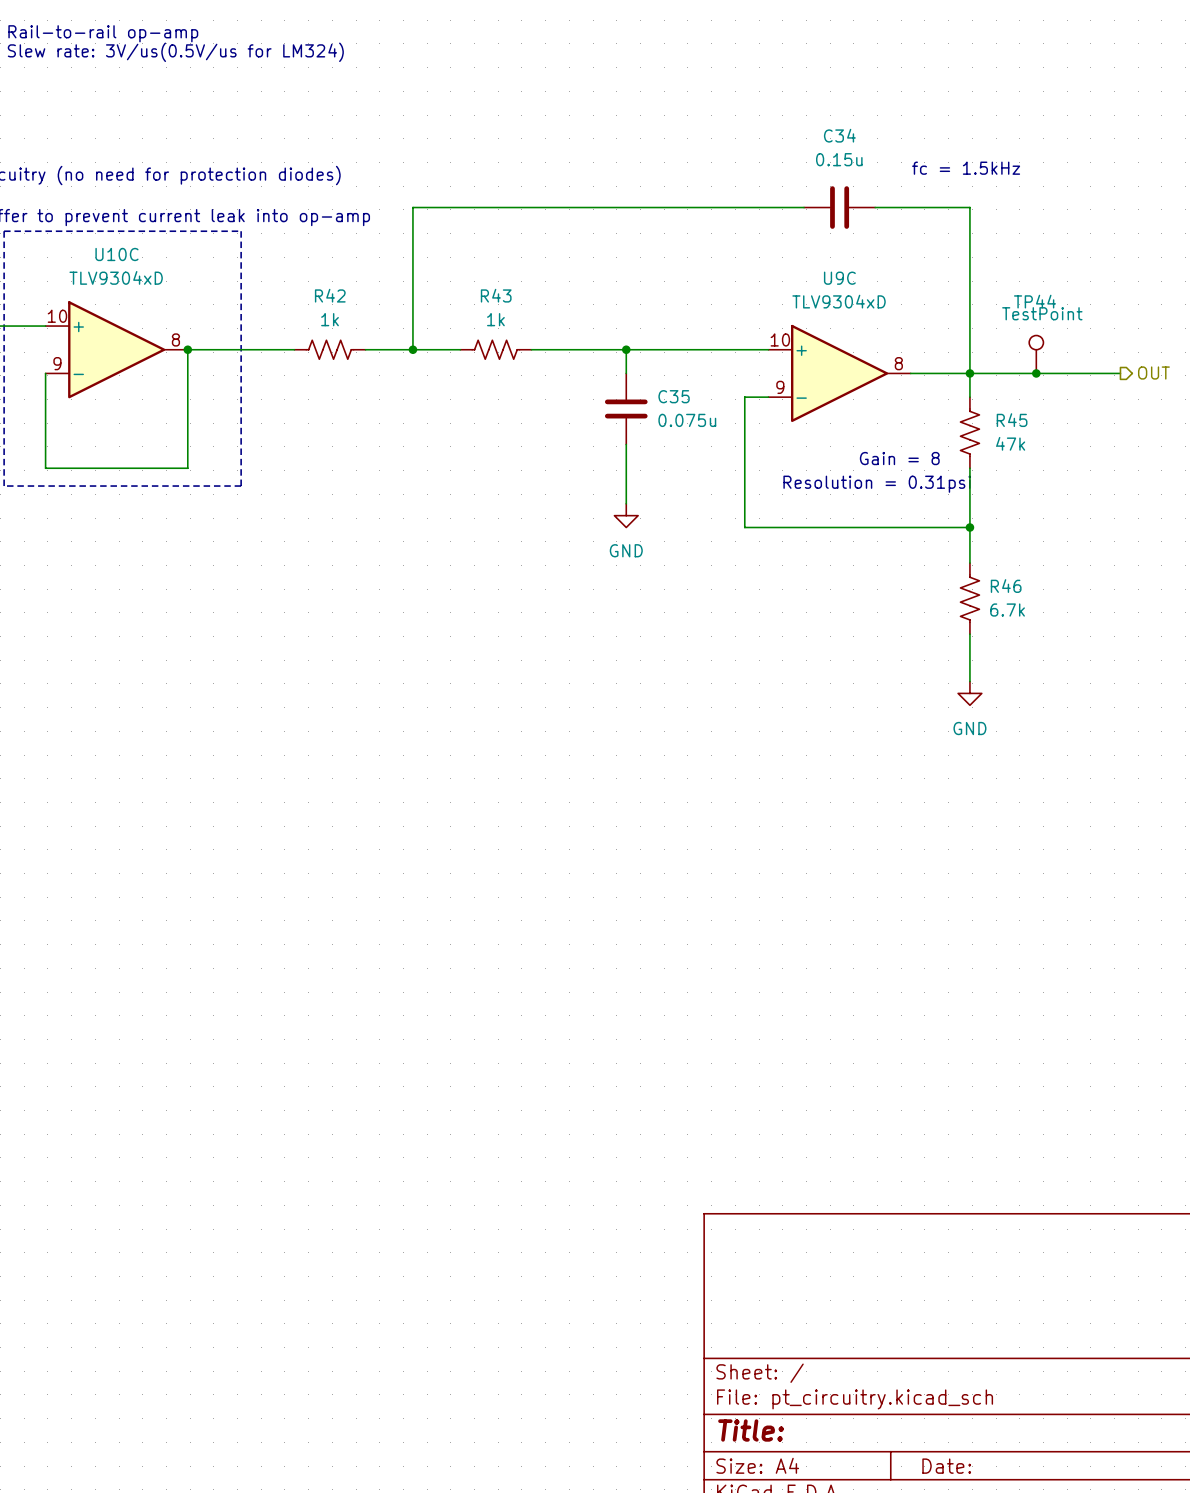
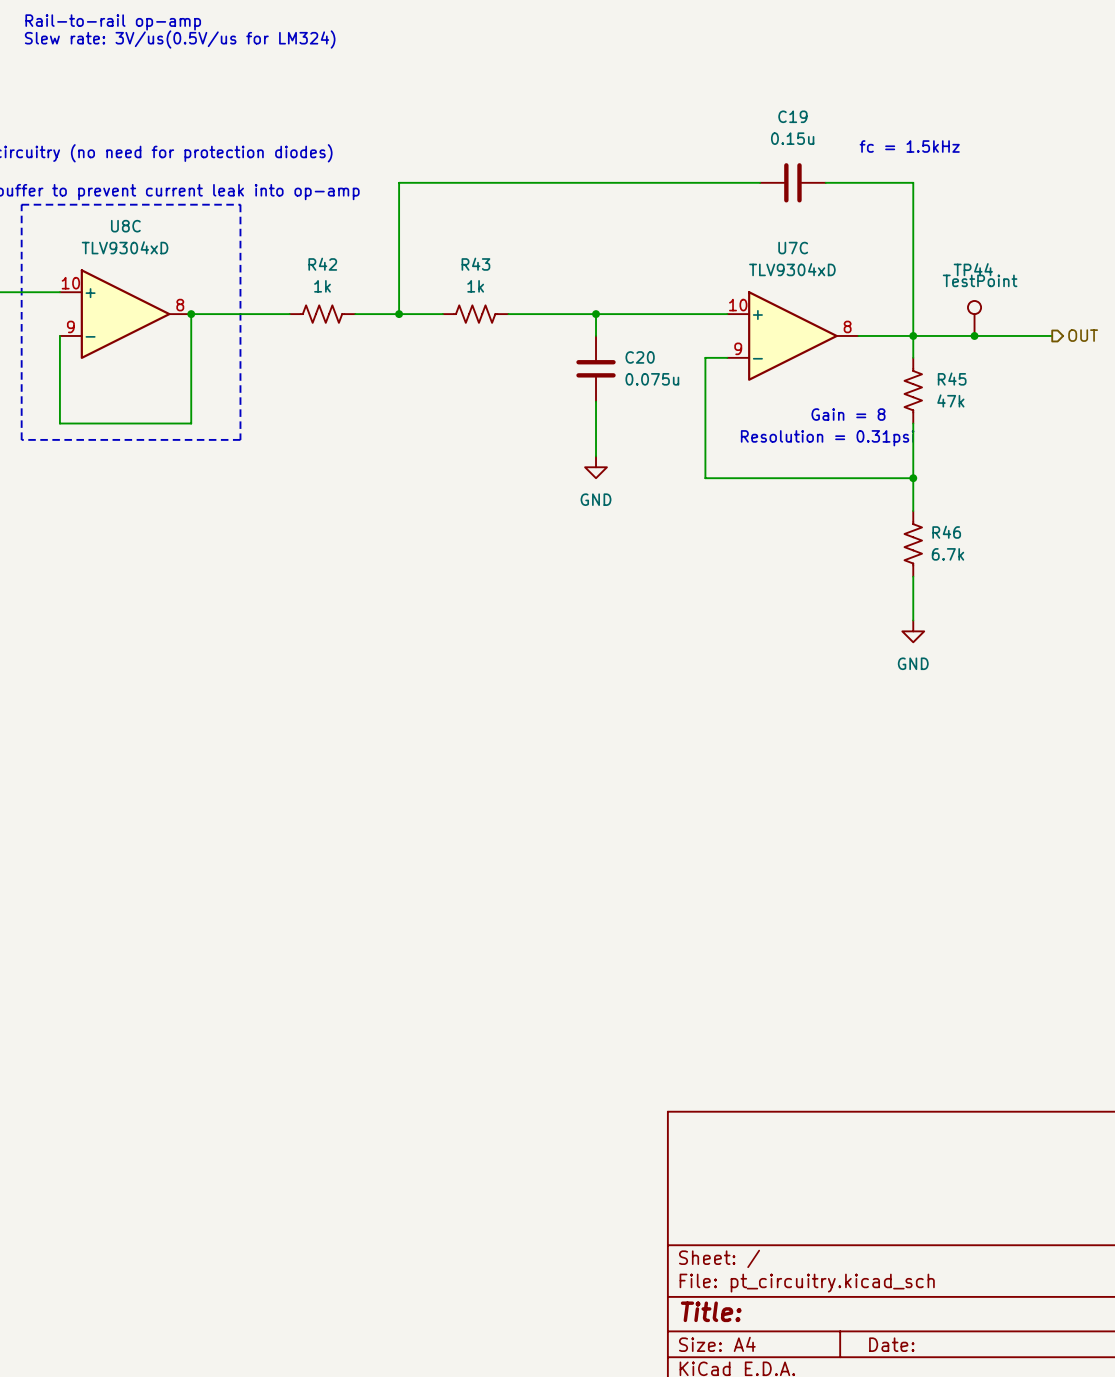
C34 name: C34 (839, 135) -> C19 (792, 116)
U10C name: U10C (116, 254) -> U8C (125, 226)
U9C name: U9C (839, 278) -> U7C (793, 248)
C35 name: C35 (674, 396) -> C20 (640, 357)

